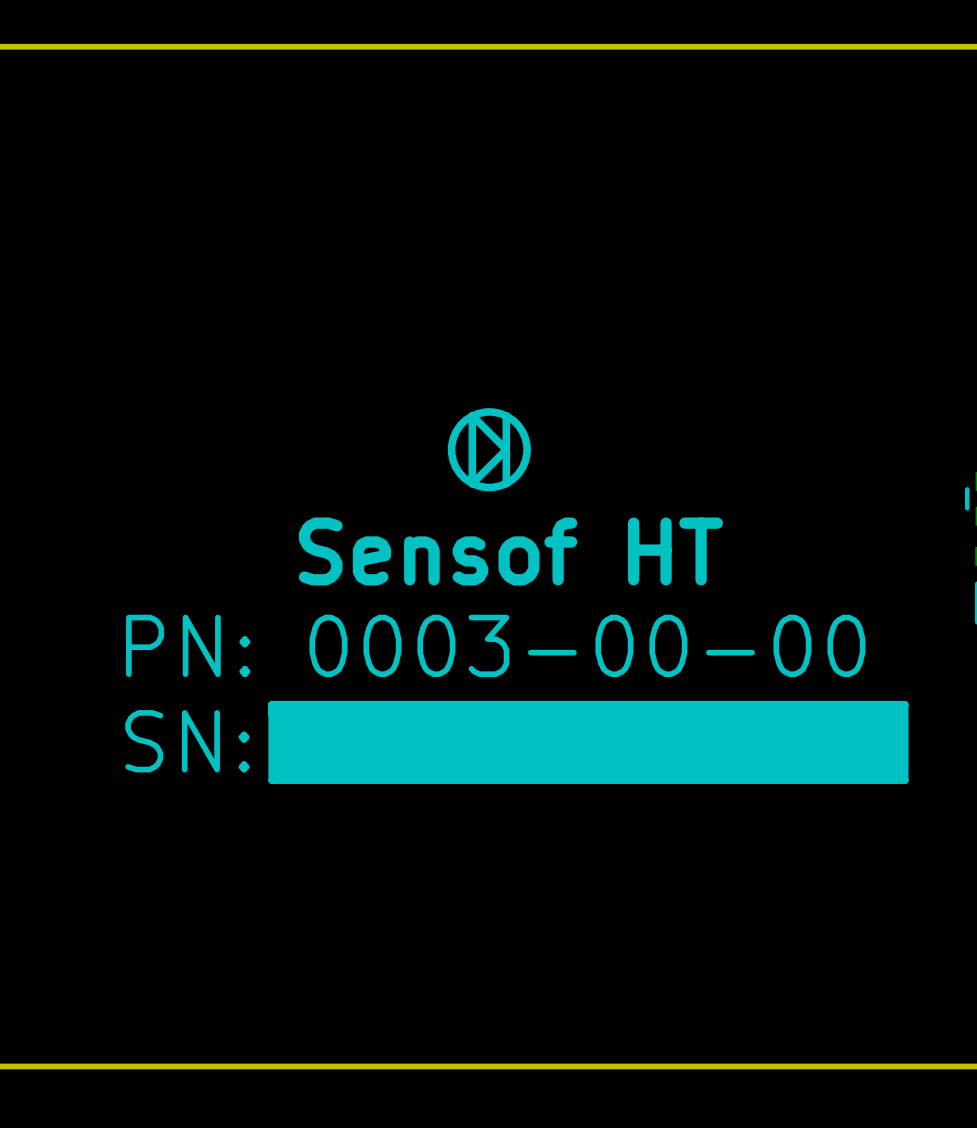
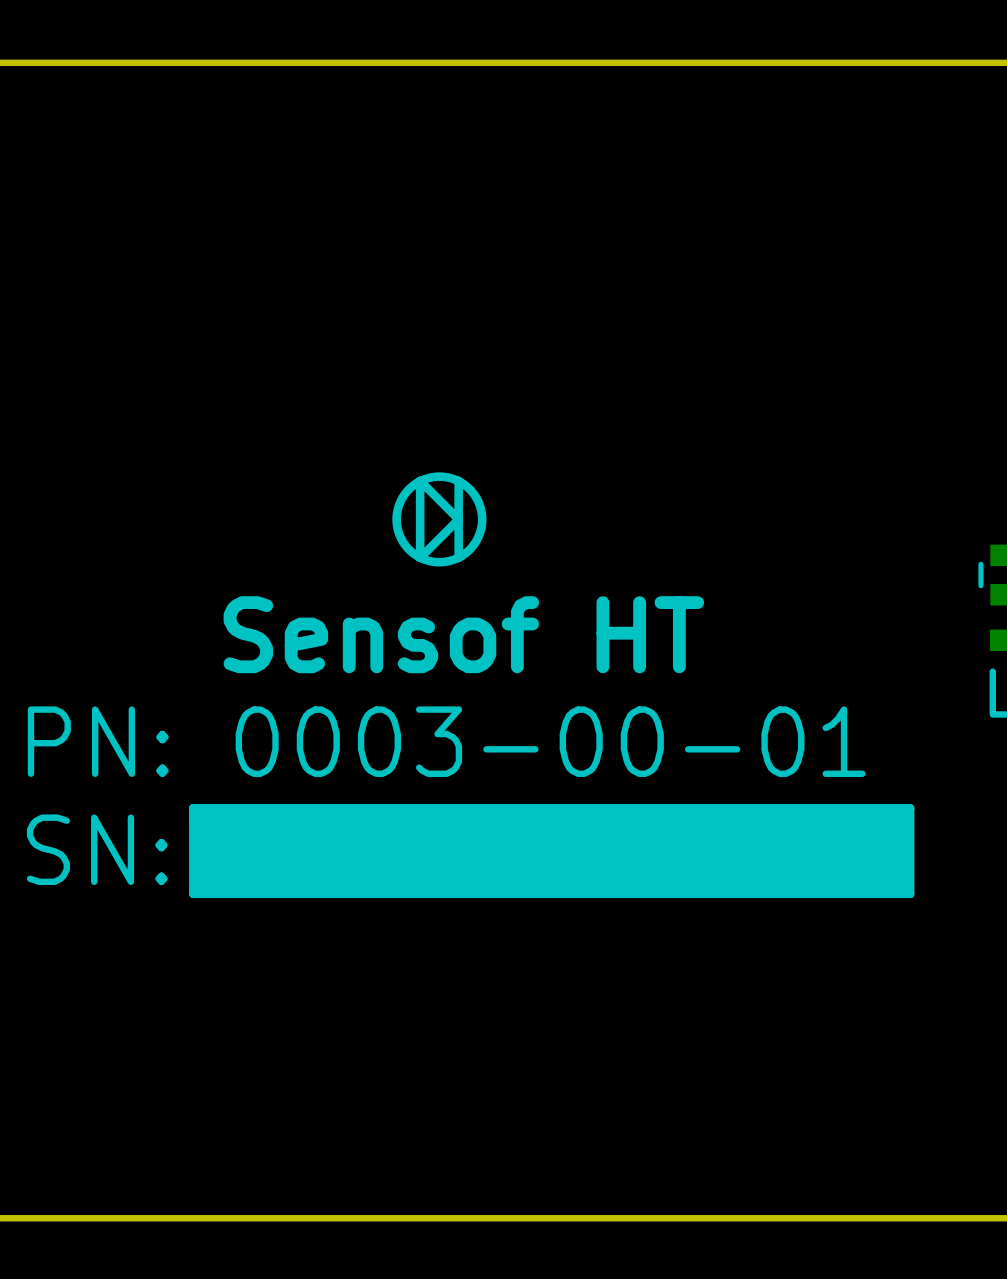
text: PN: 0003-00-00 (495, 645) -> PN: 0003-00-01 (446, 741)

